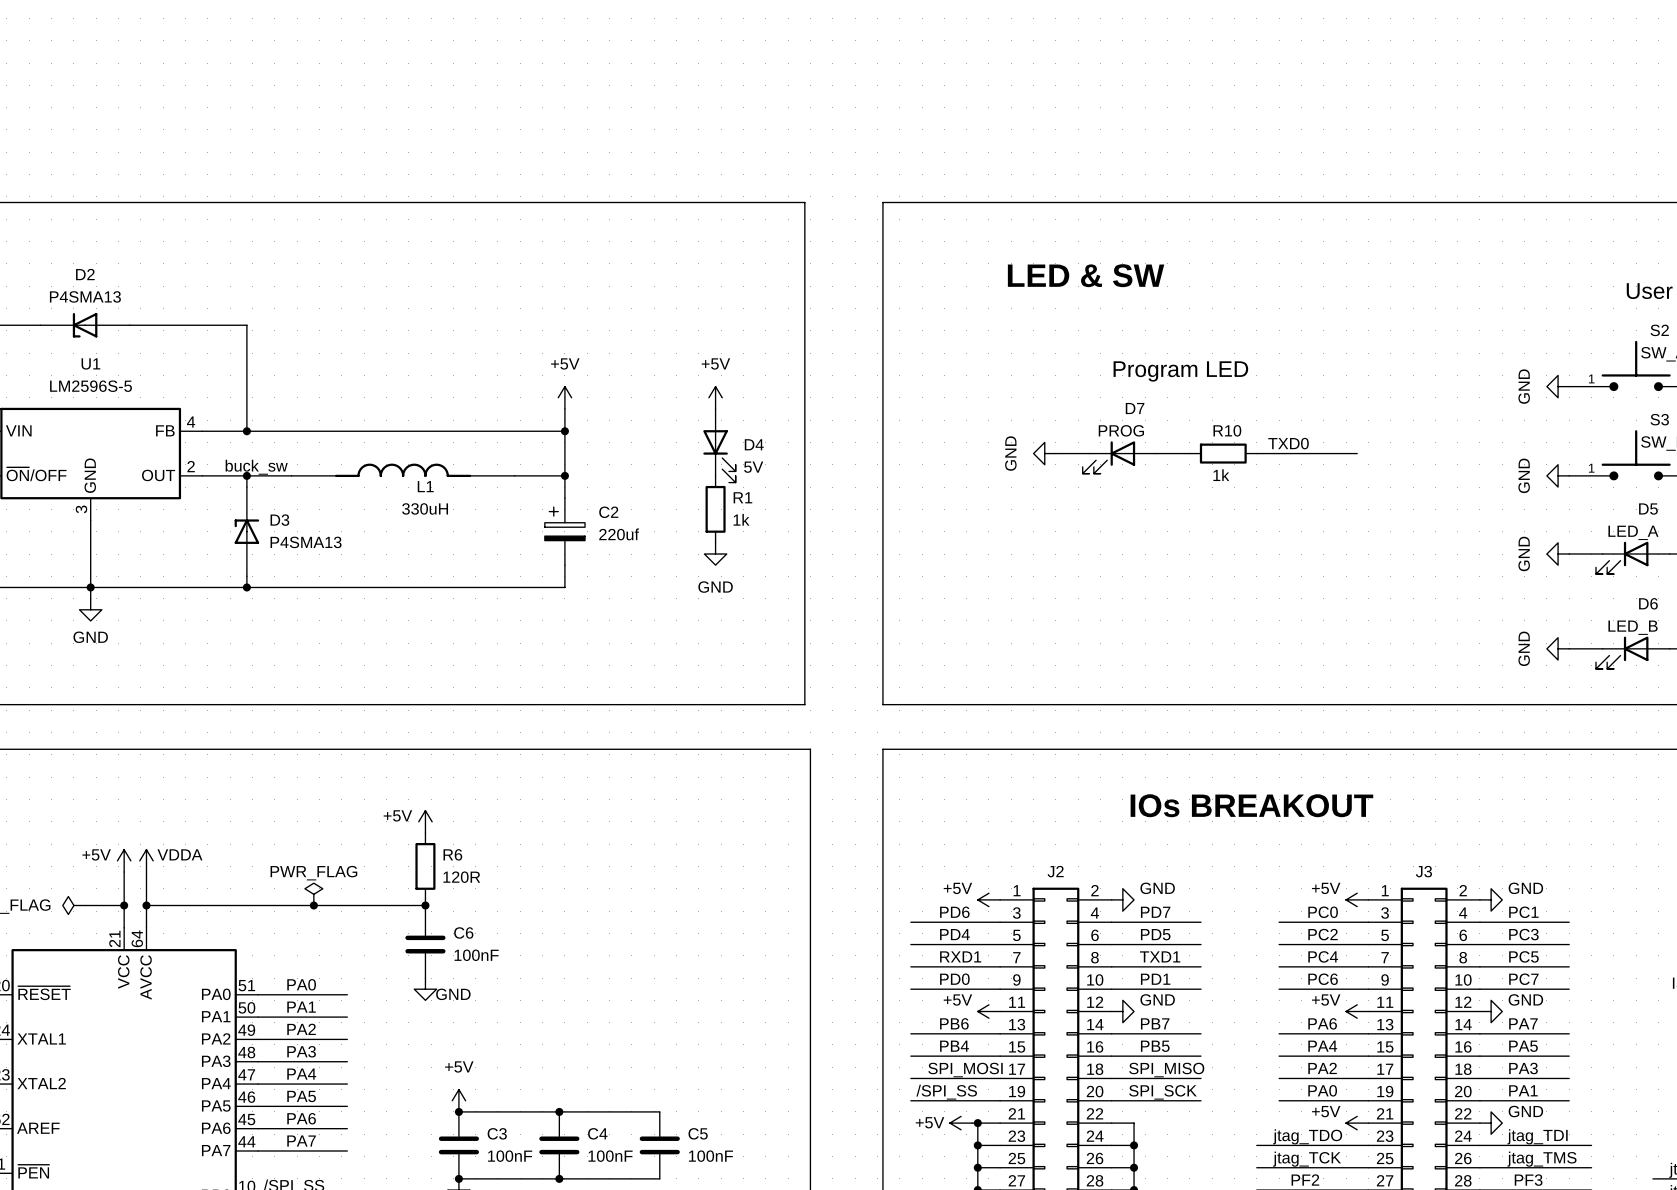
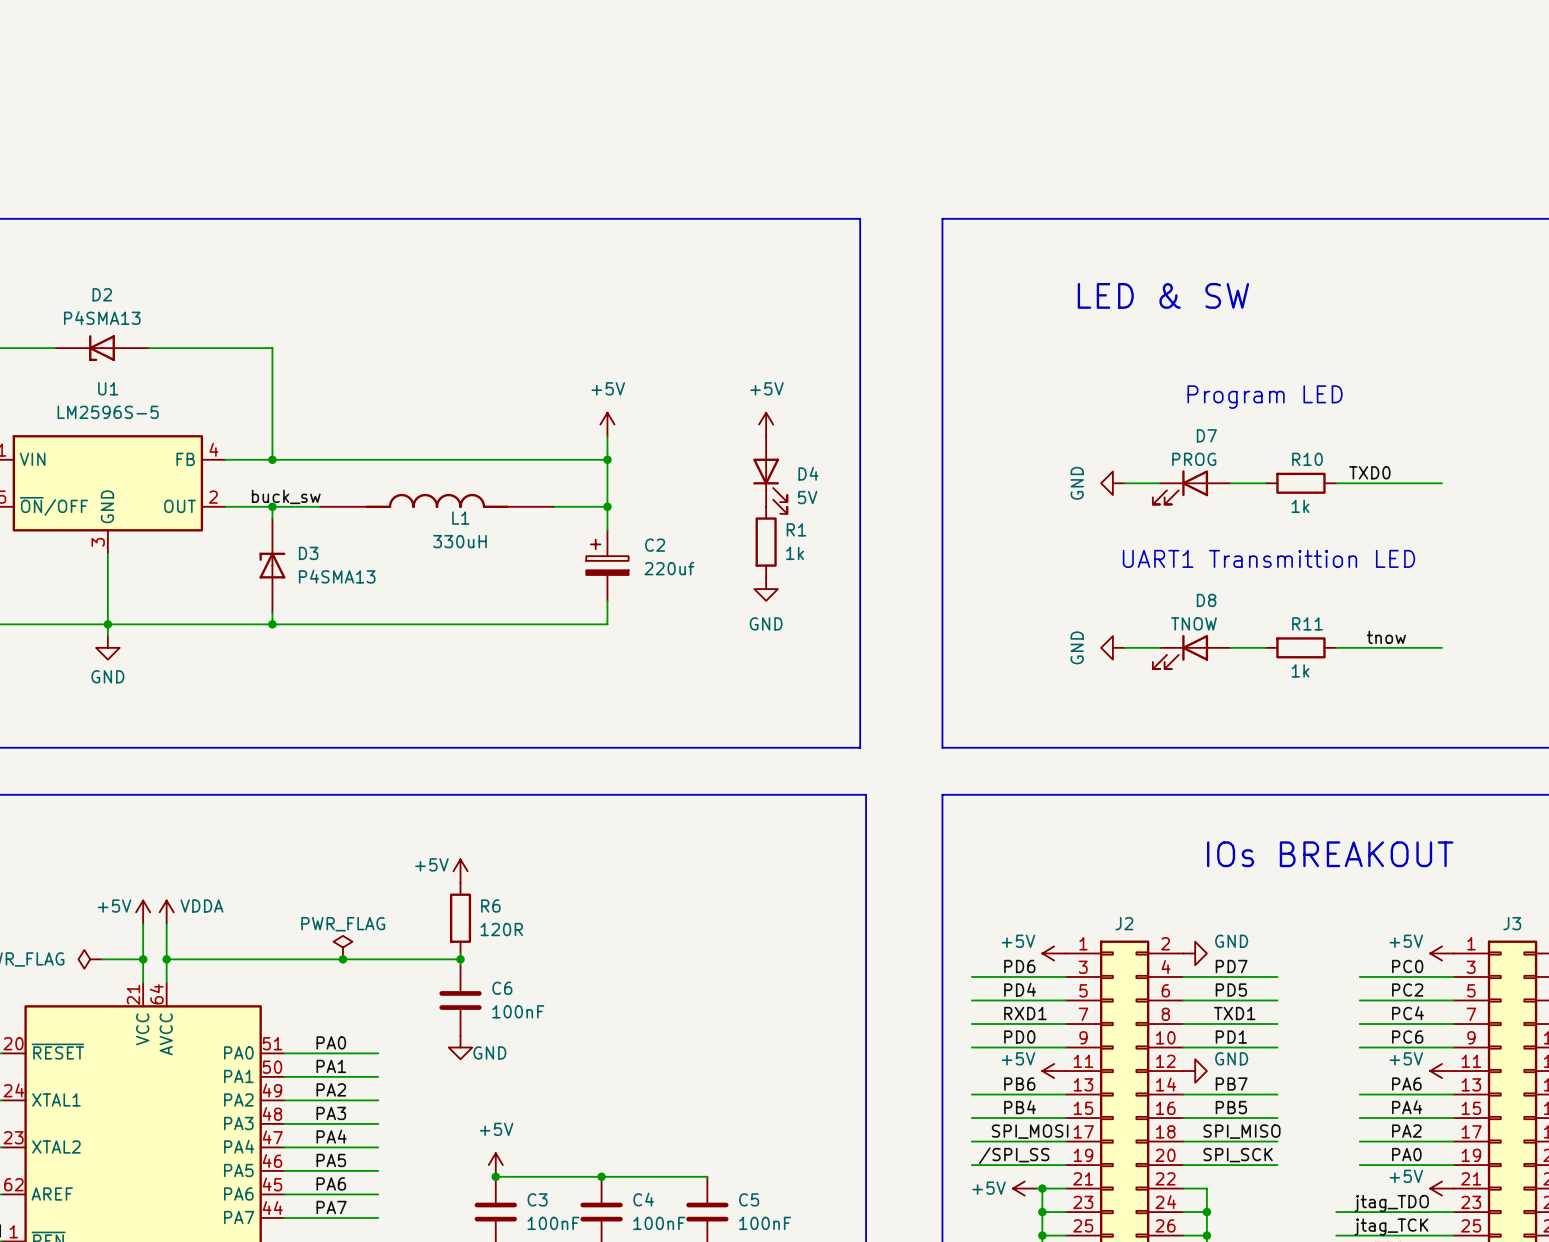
text: none -> UART1 Transmittion LED (1268, 558)
label: none -> tnow (1386, 637)
power symbol: none -> GND (1112, 647)
wire: none -> (1124, 647) (1159, 647)
wire: none -> (1230, 647) (1265, 647)
R11: none -> 1k (1300, 647)
wire: none -> (1336, 647) (1442, 647)
D8: none -> TNOW (1191, 651)

